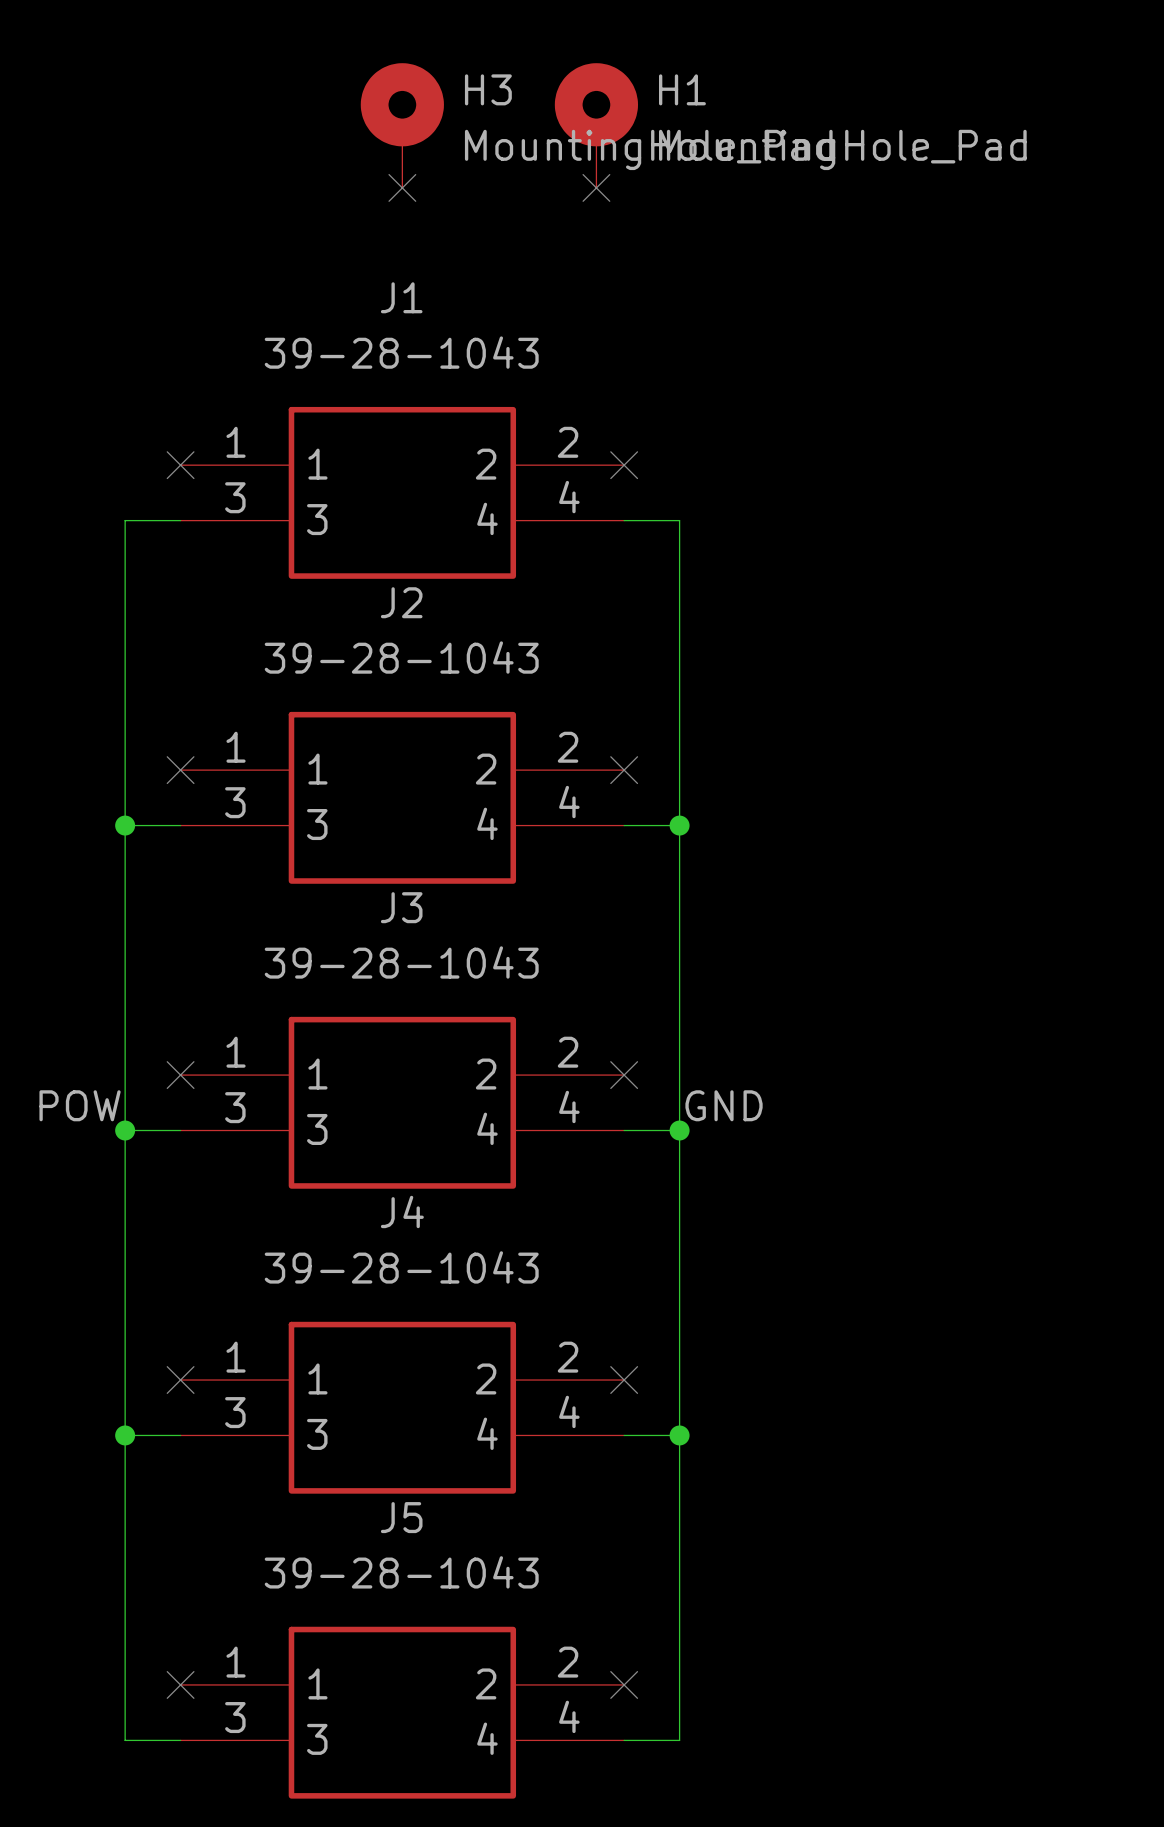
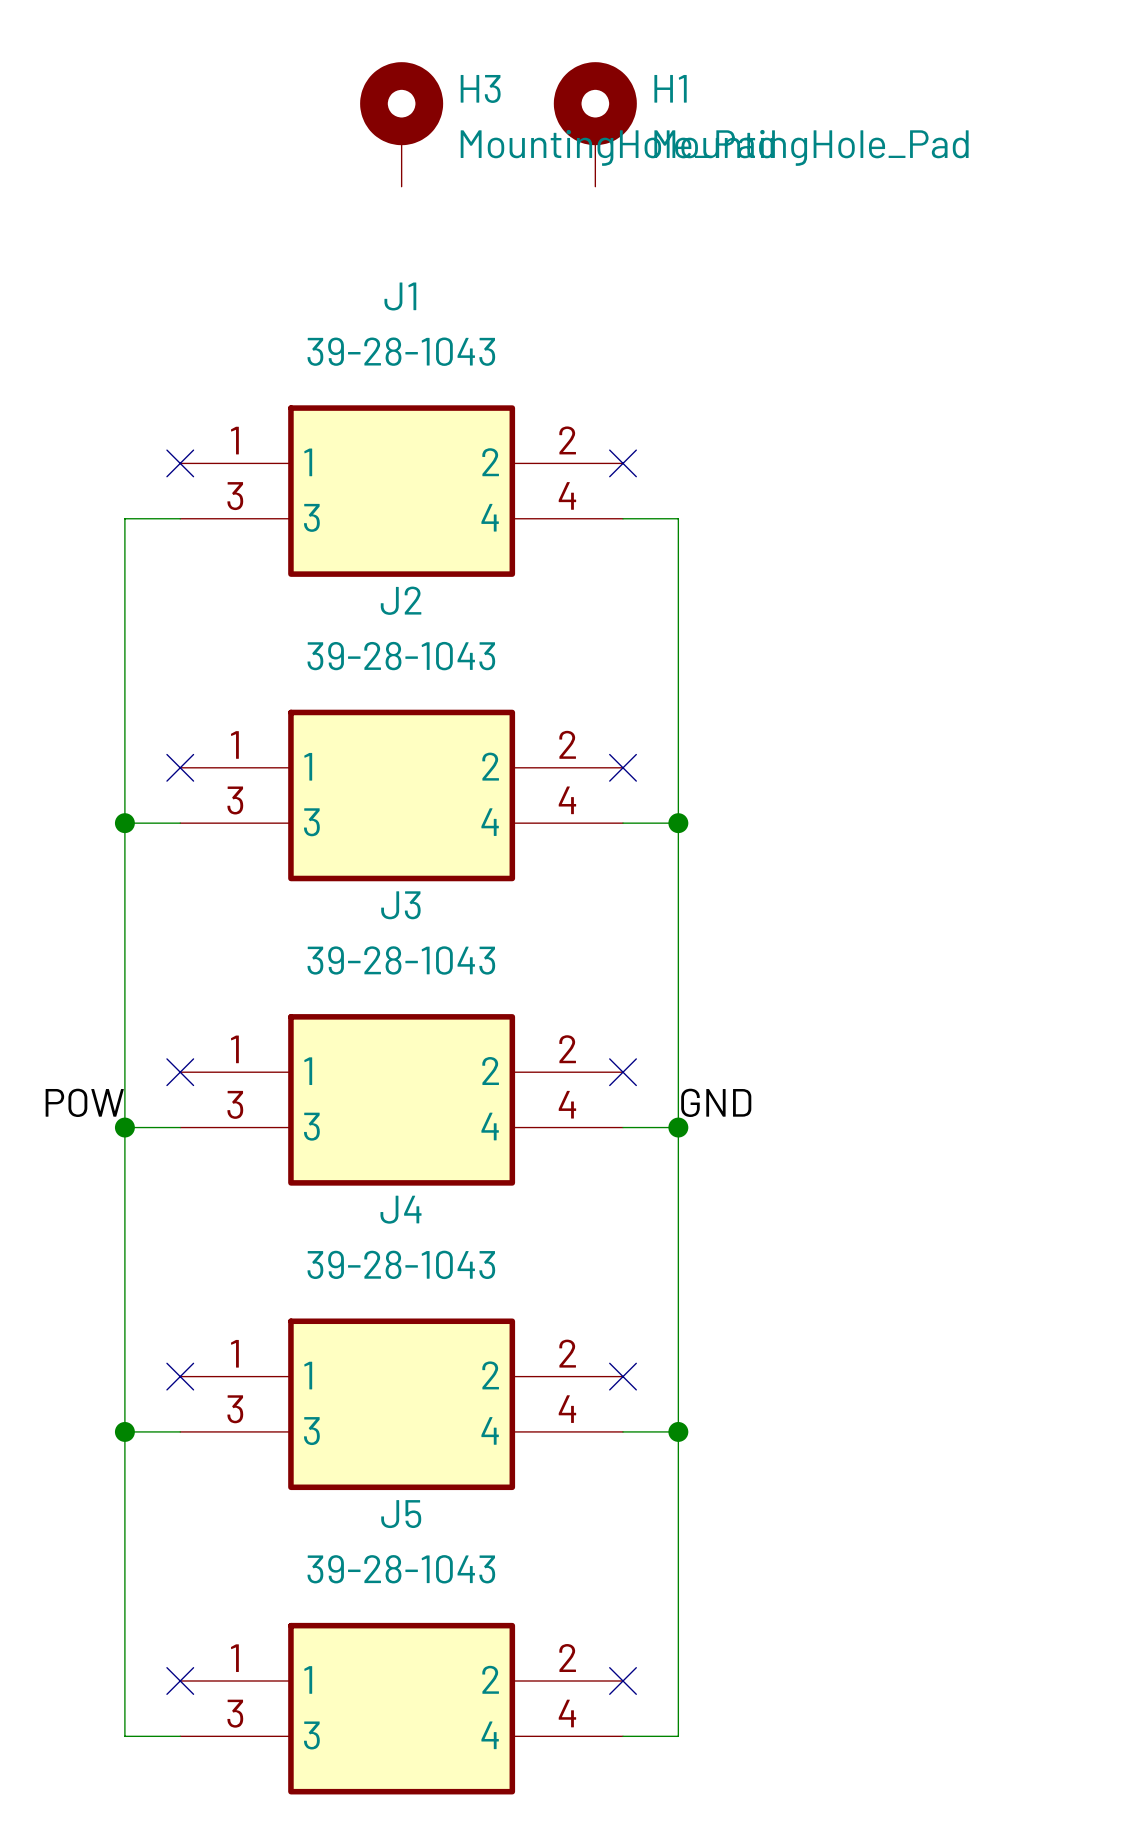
no-connect mark: (402, 187) -> none
no-connect mark: (596, 187) -> none

